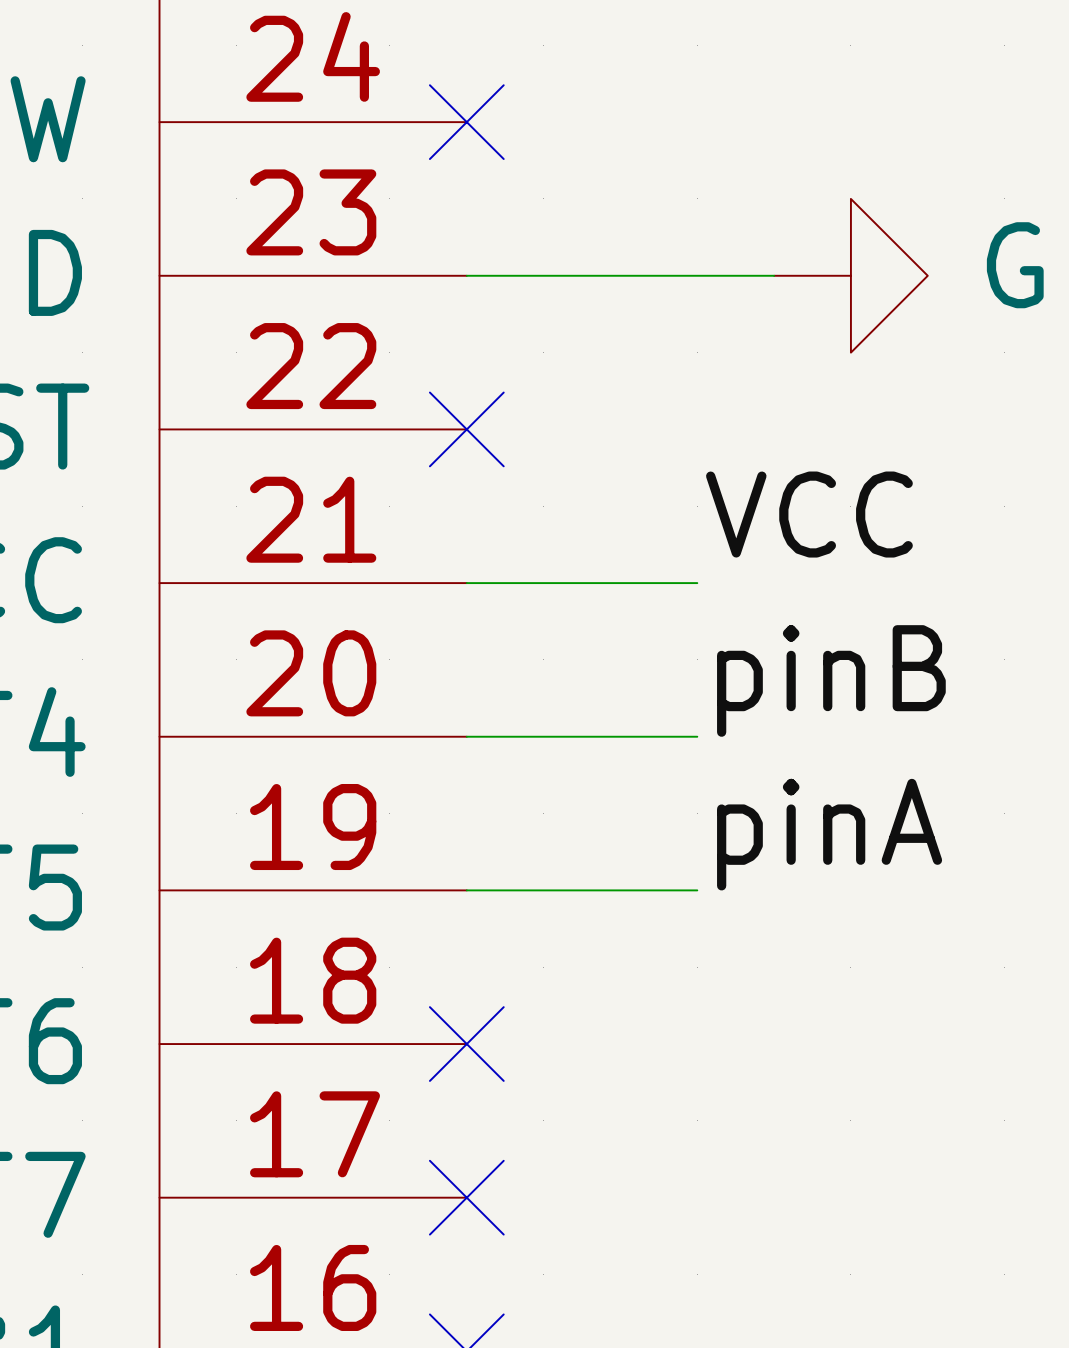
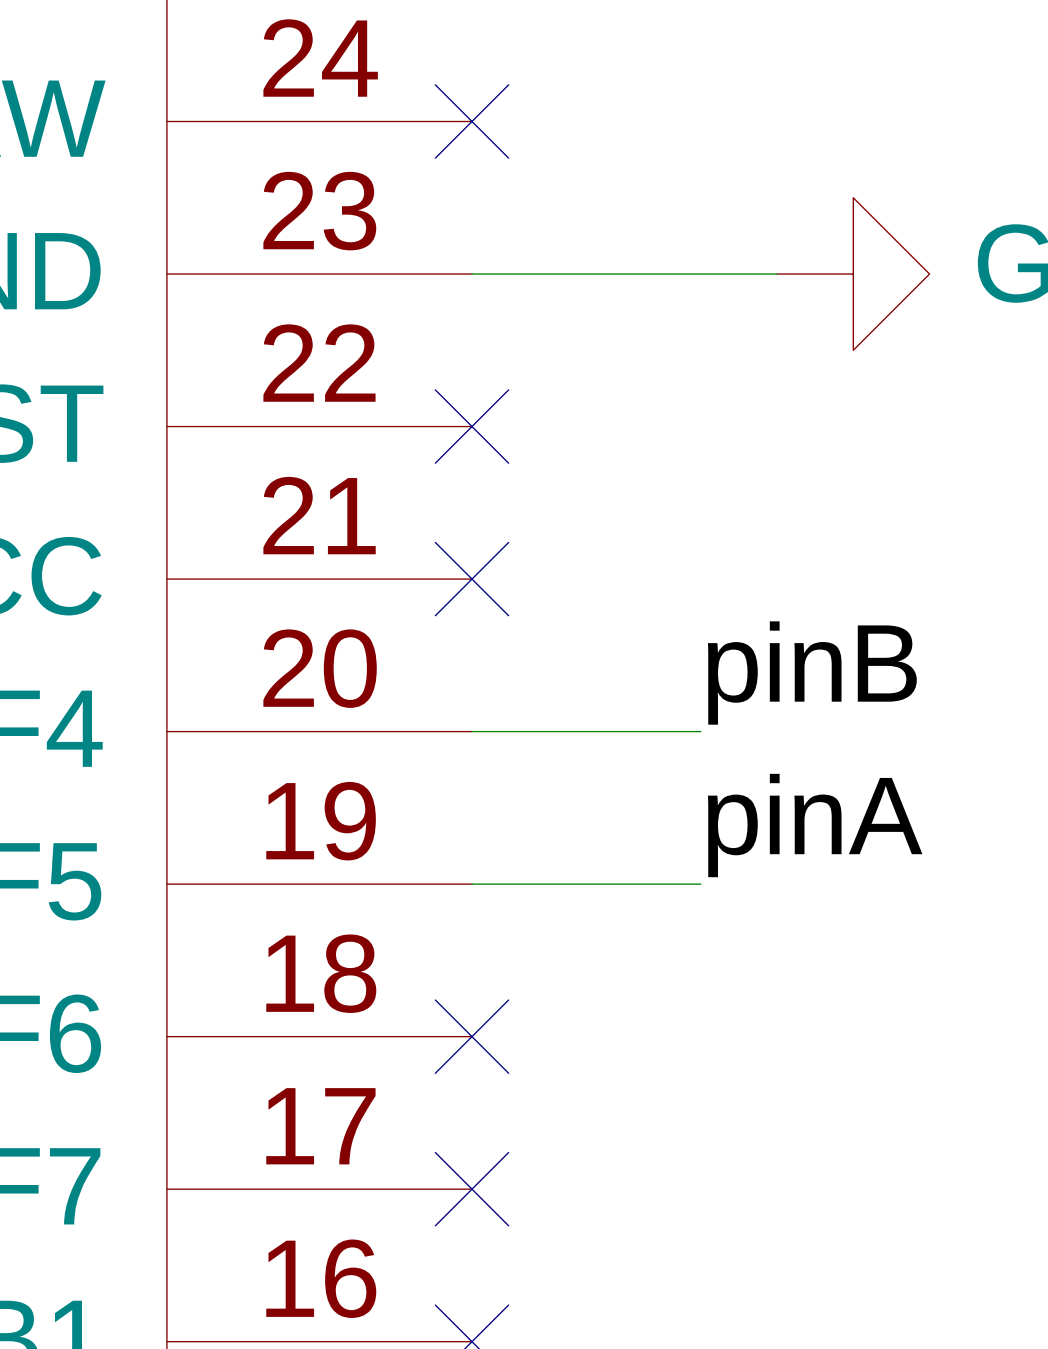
label: VCC (809, 514) -> none
wire: (466, 583) (697, 583) -> none
no-connect mark: none -> (471, 579)

